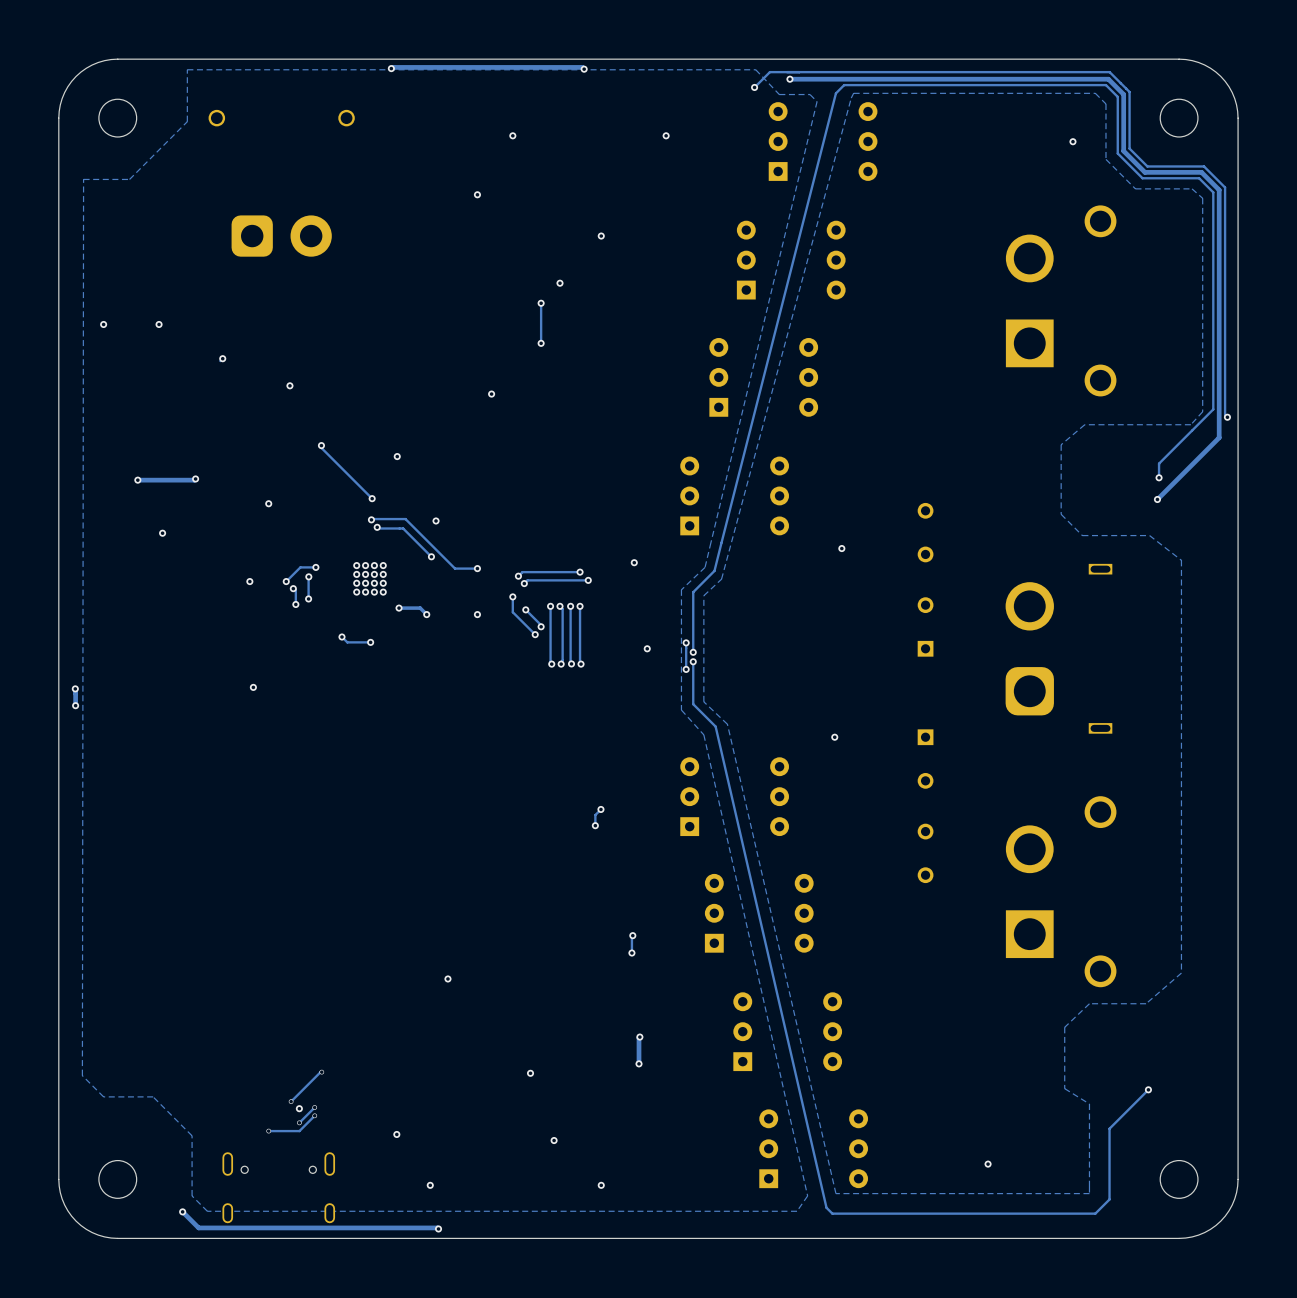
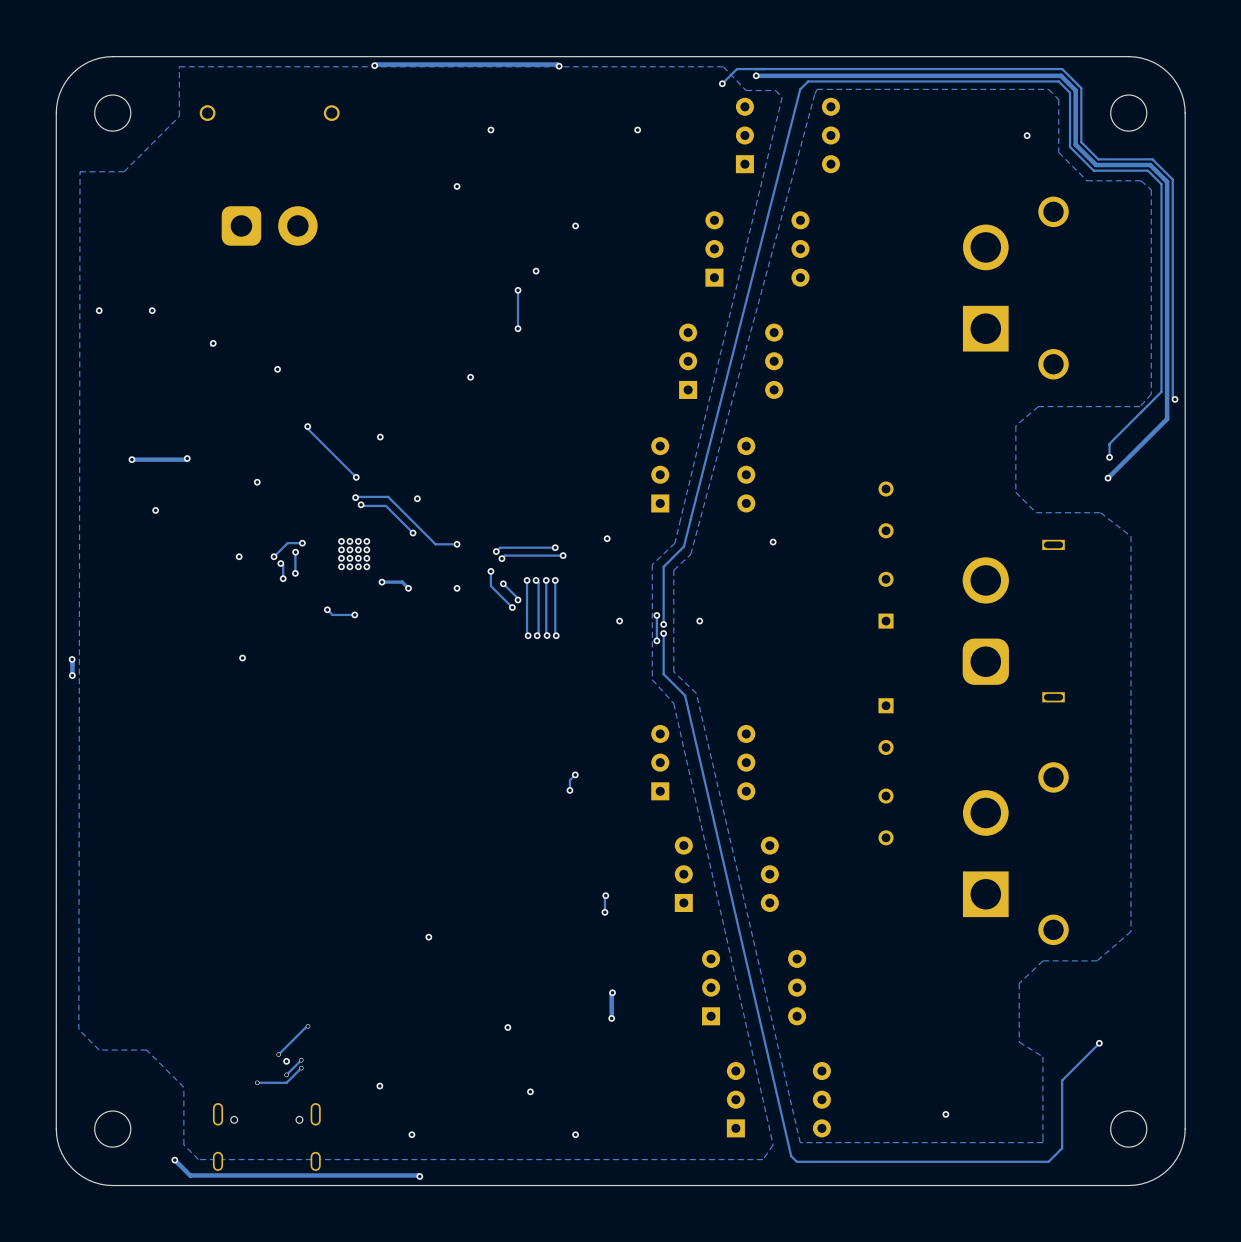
via position: (841, 548) -> (773, 542)
via: none -> (699, 621)
via: (834, 737) -> none

